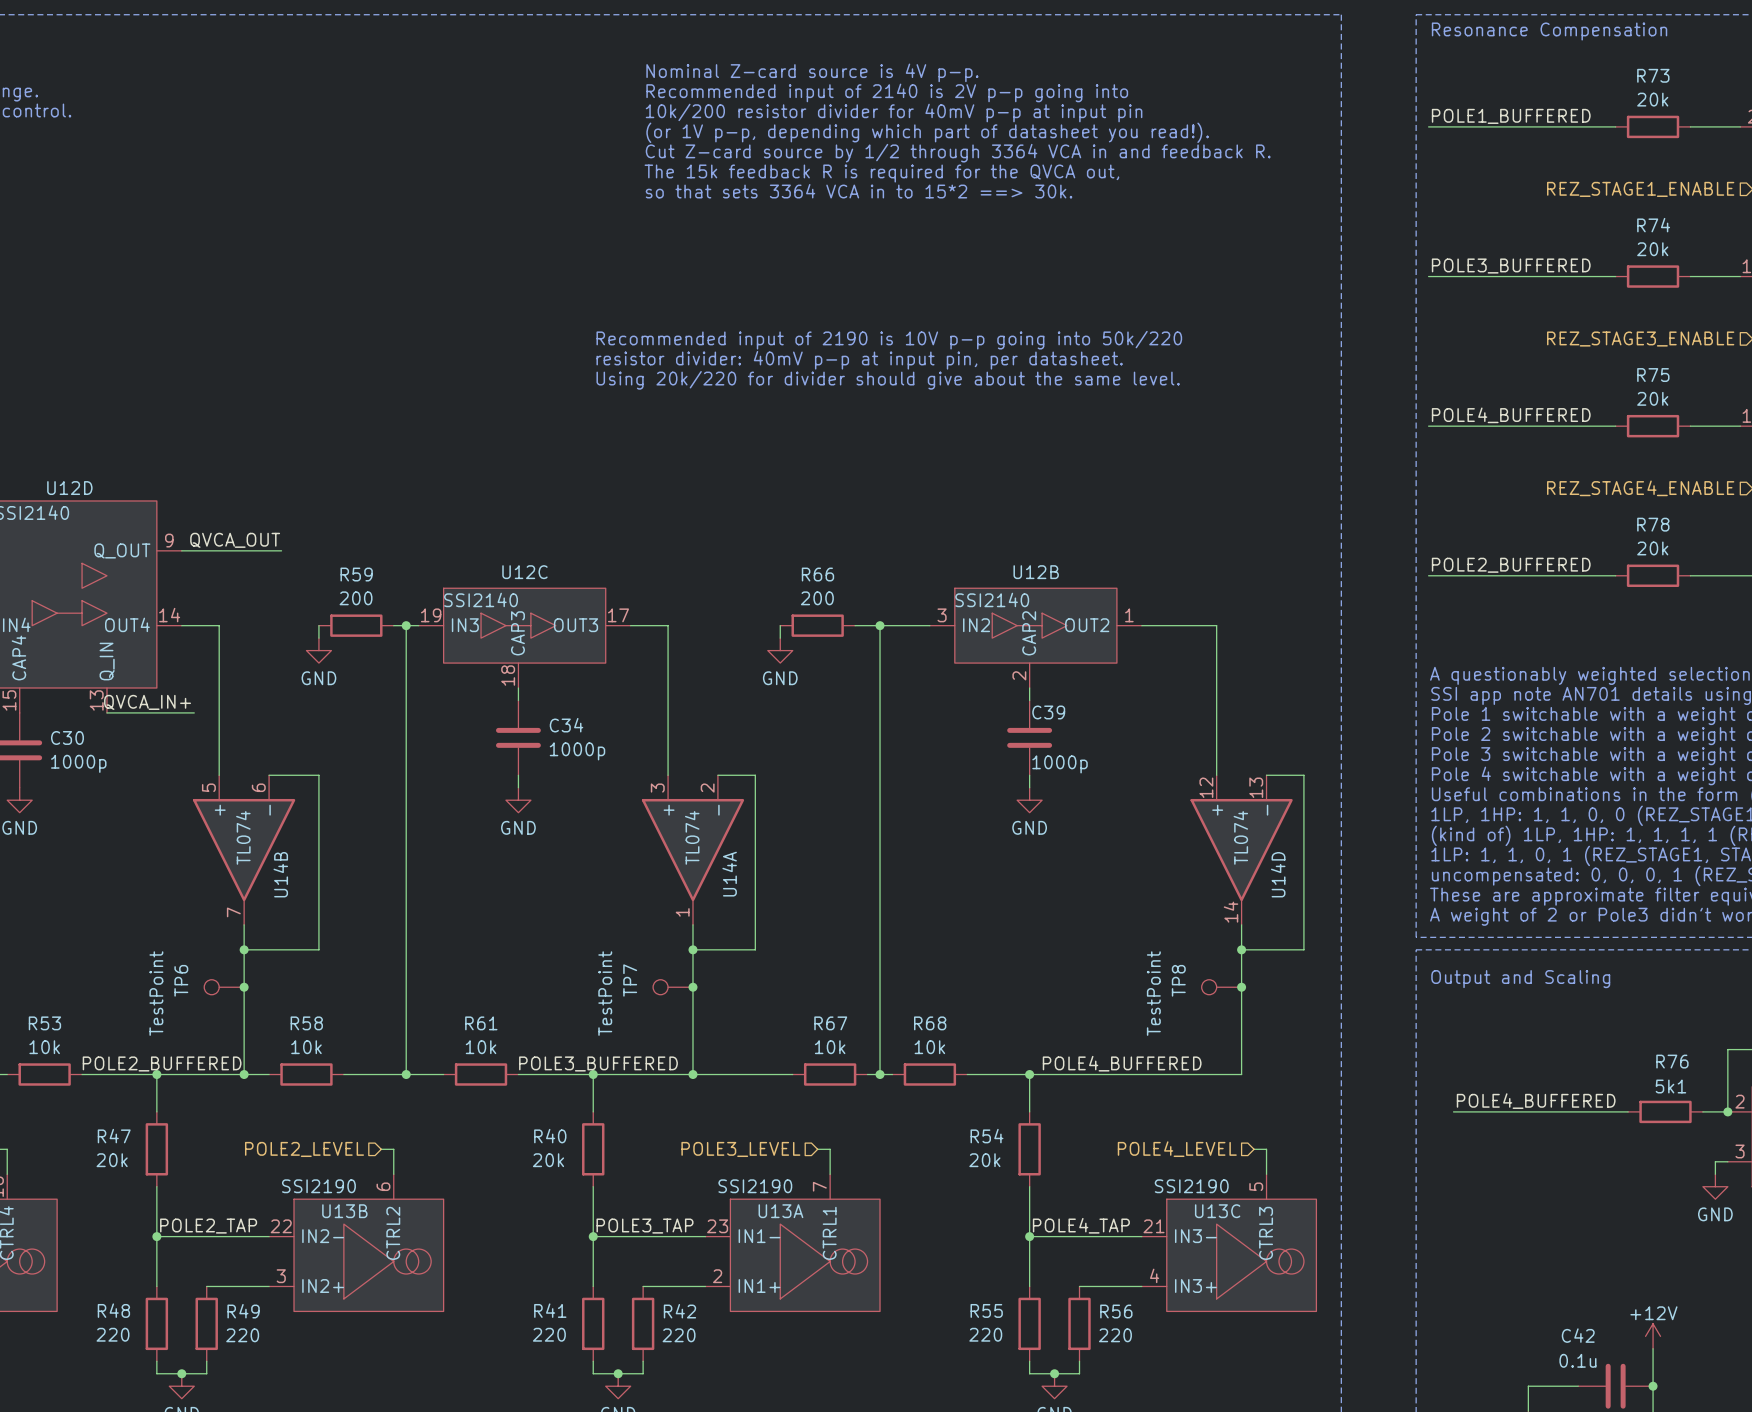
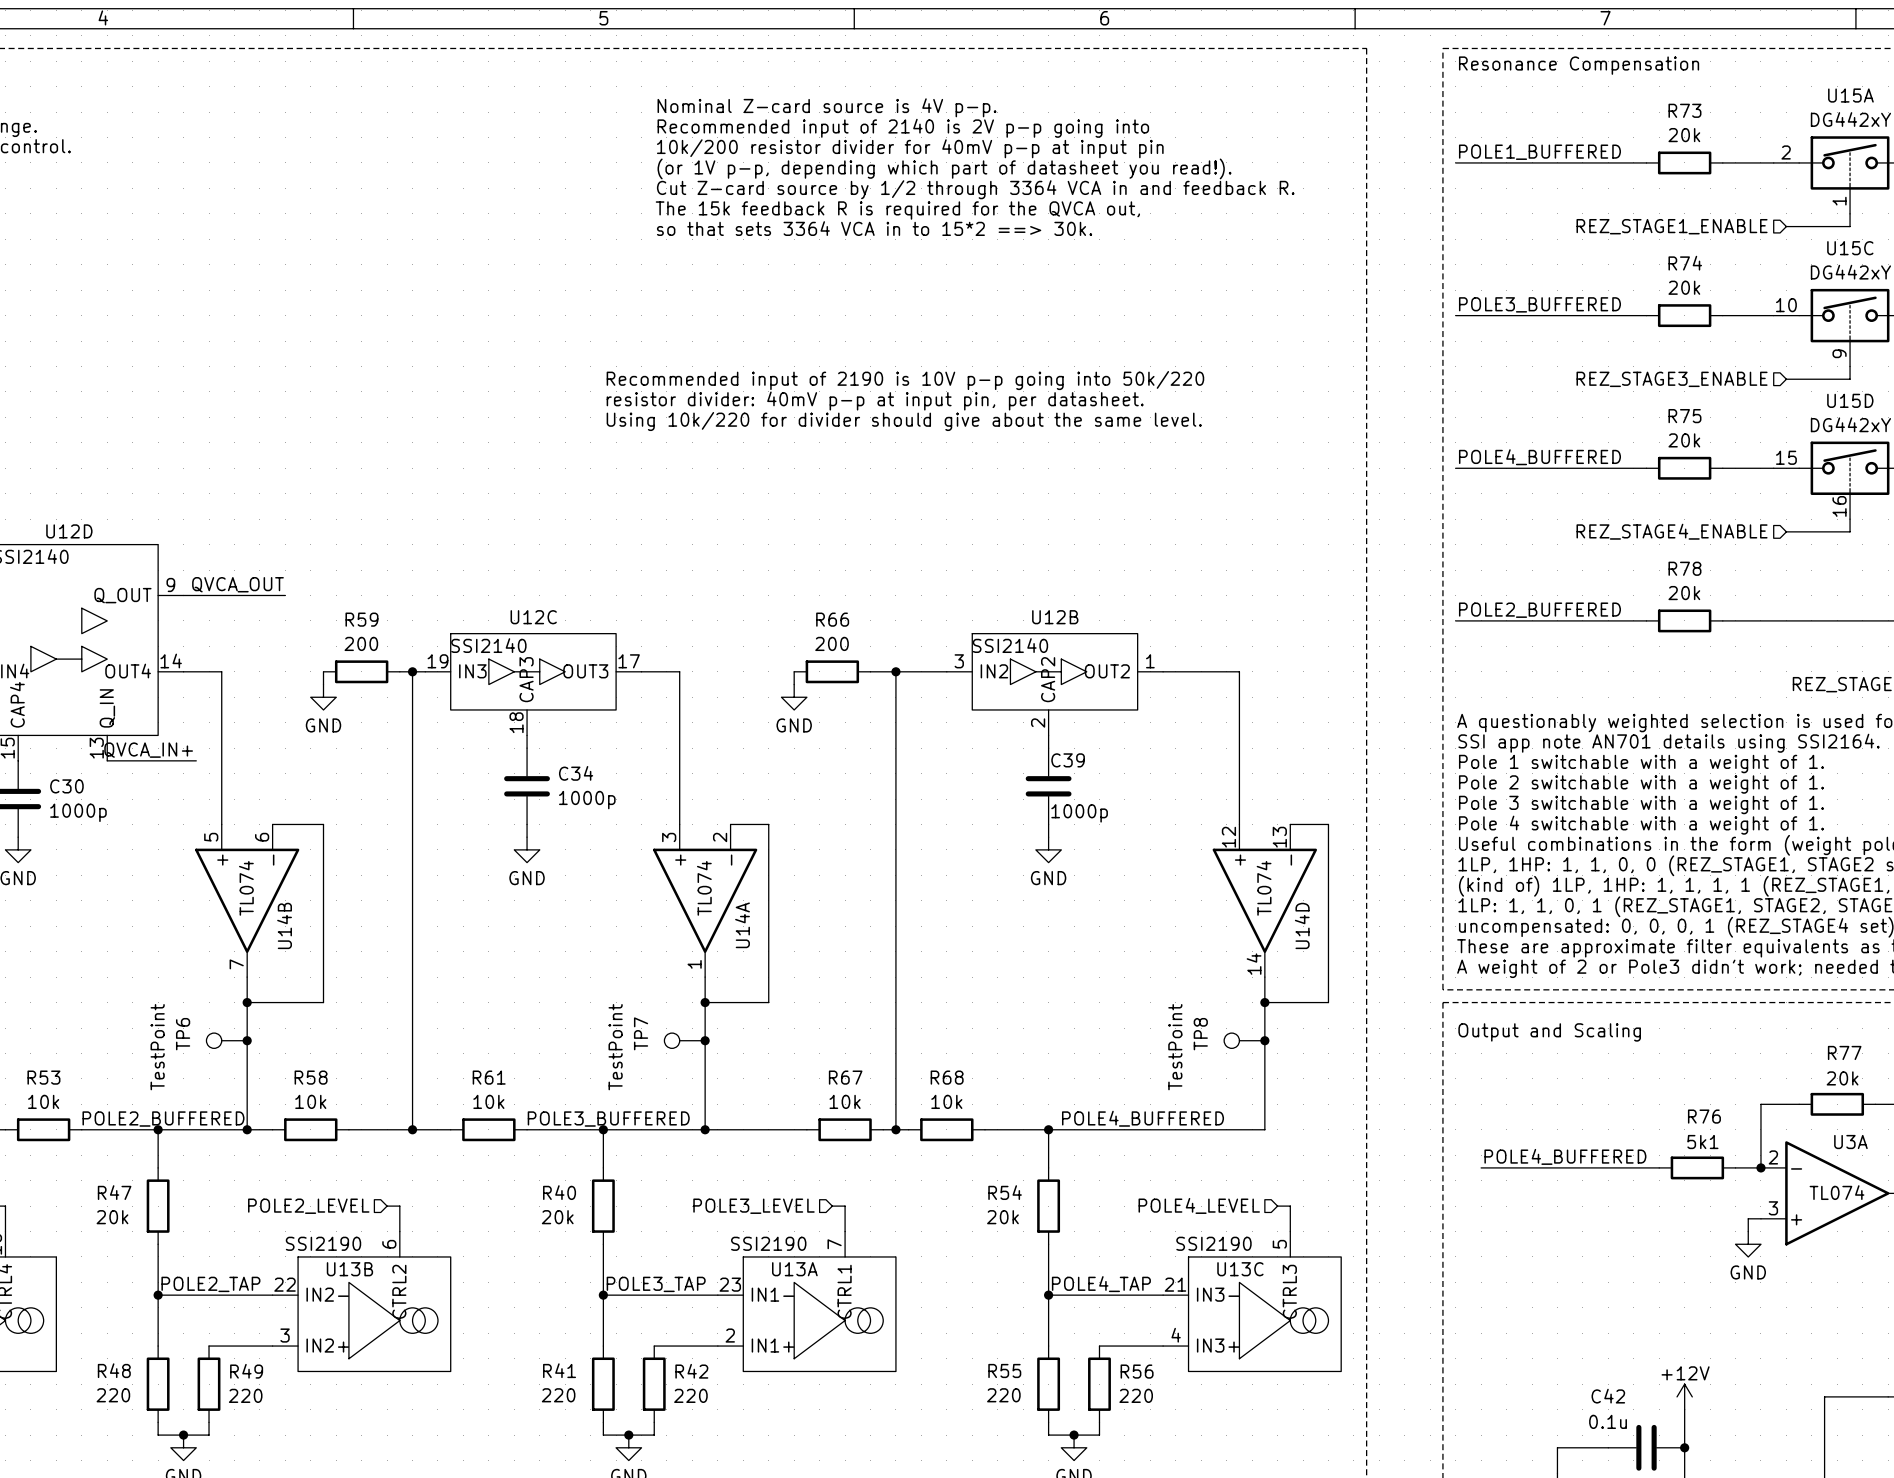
text: Using 20k/220 for divider should give about the same level. (888, 380) -> Using 10k/220 for divider should give about the same level. (904, 421)

